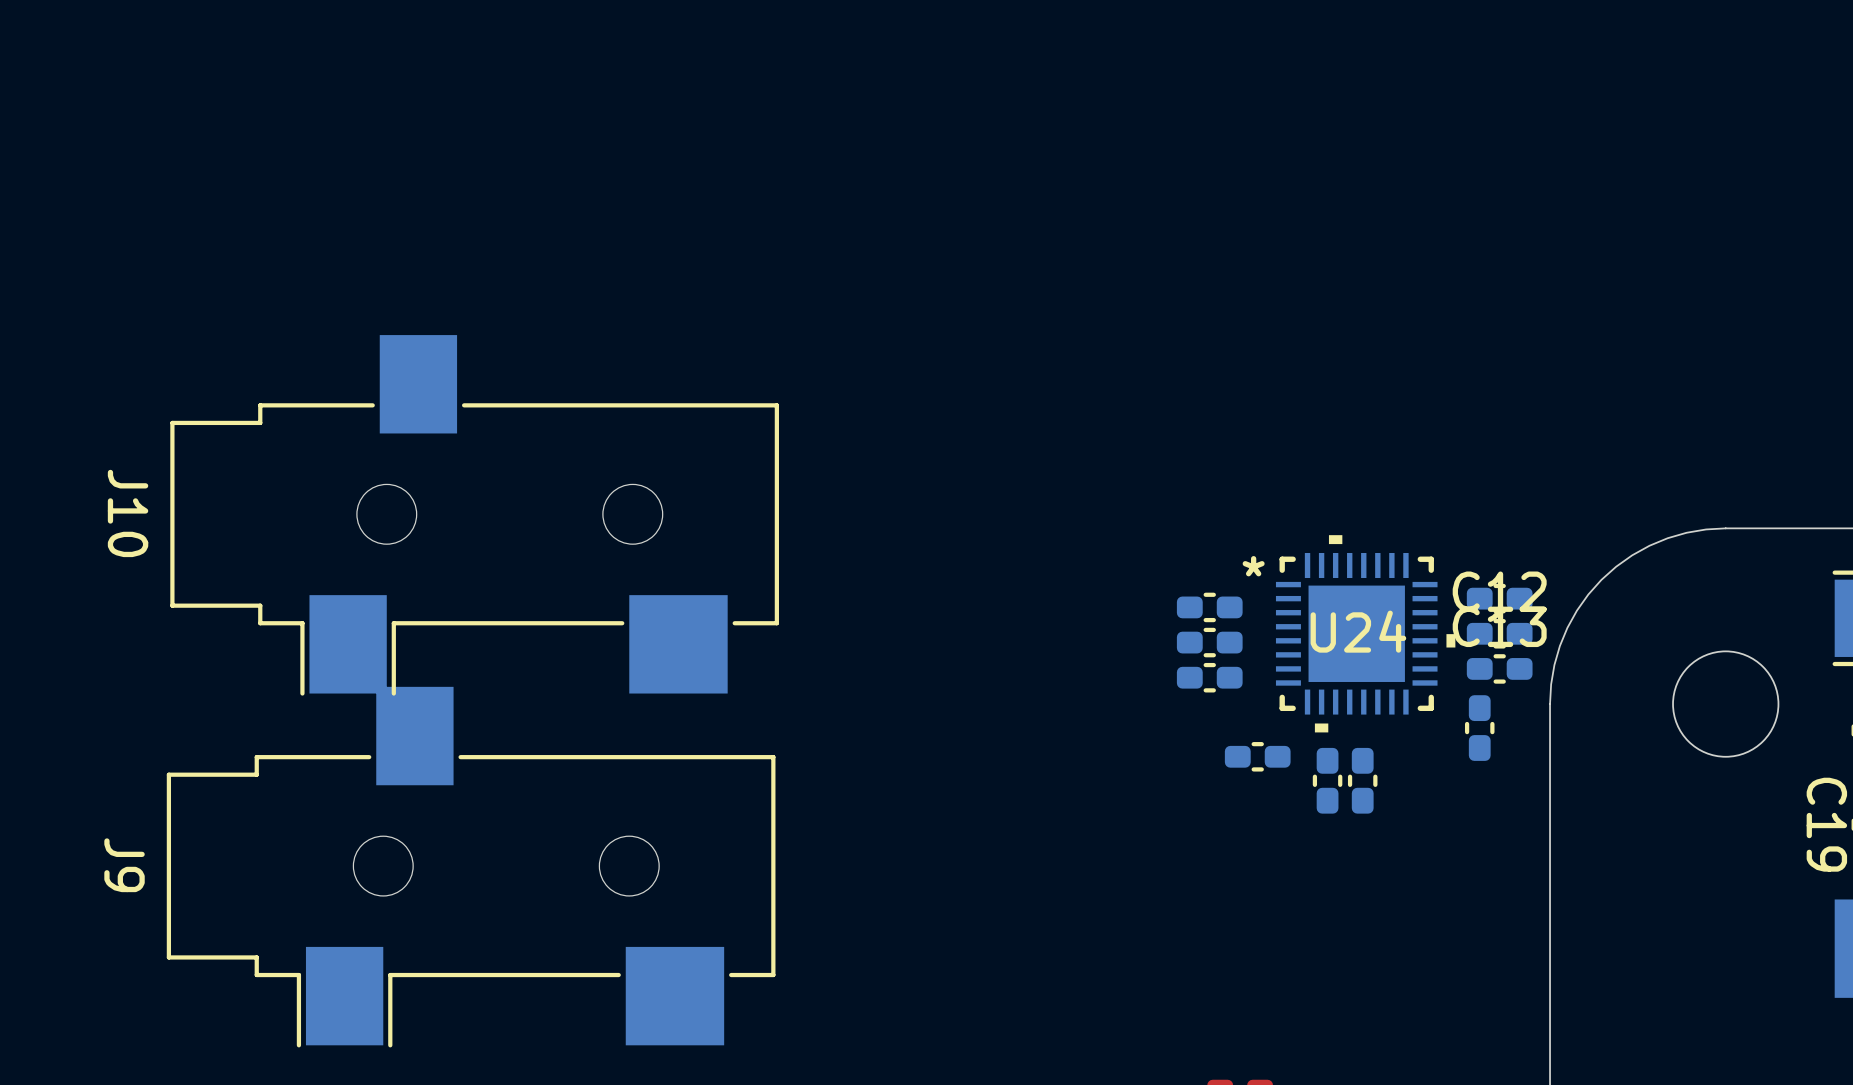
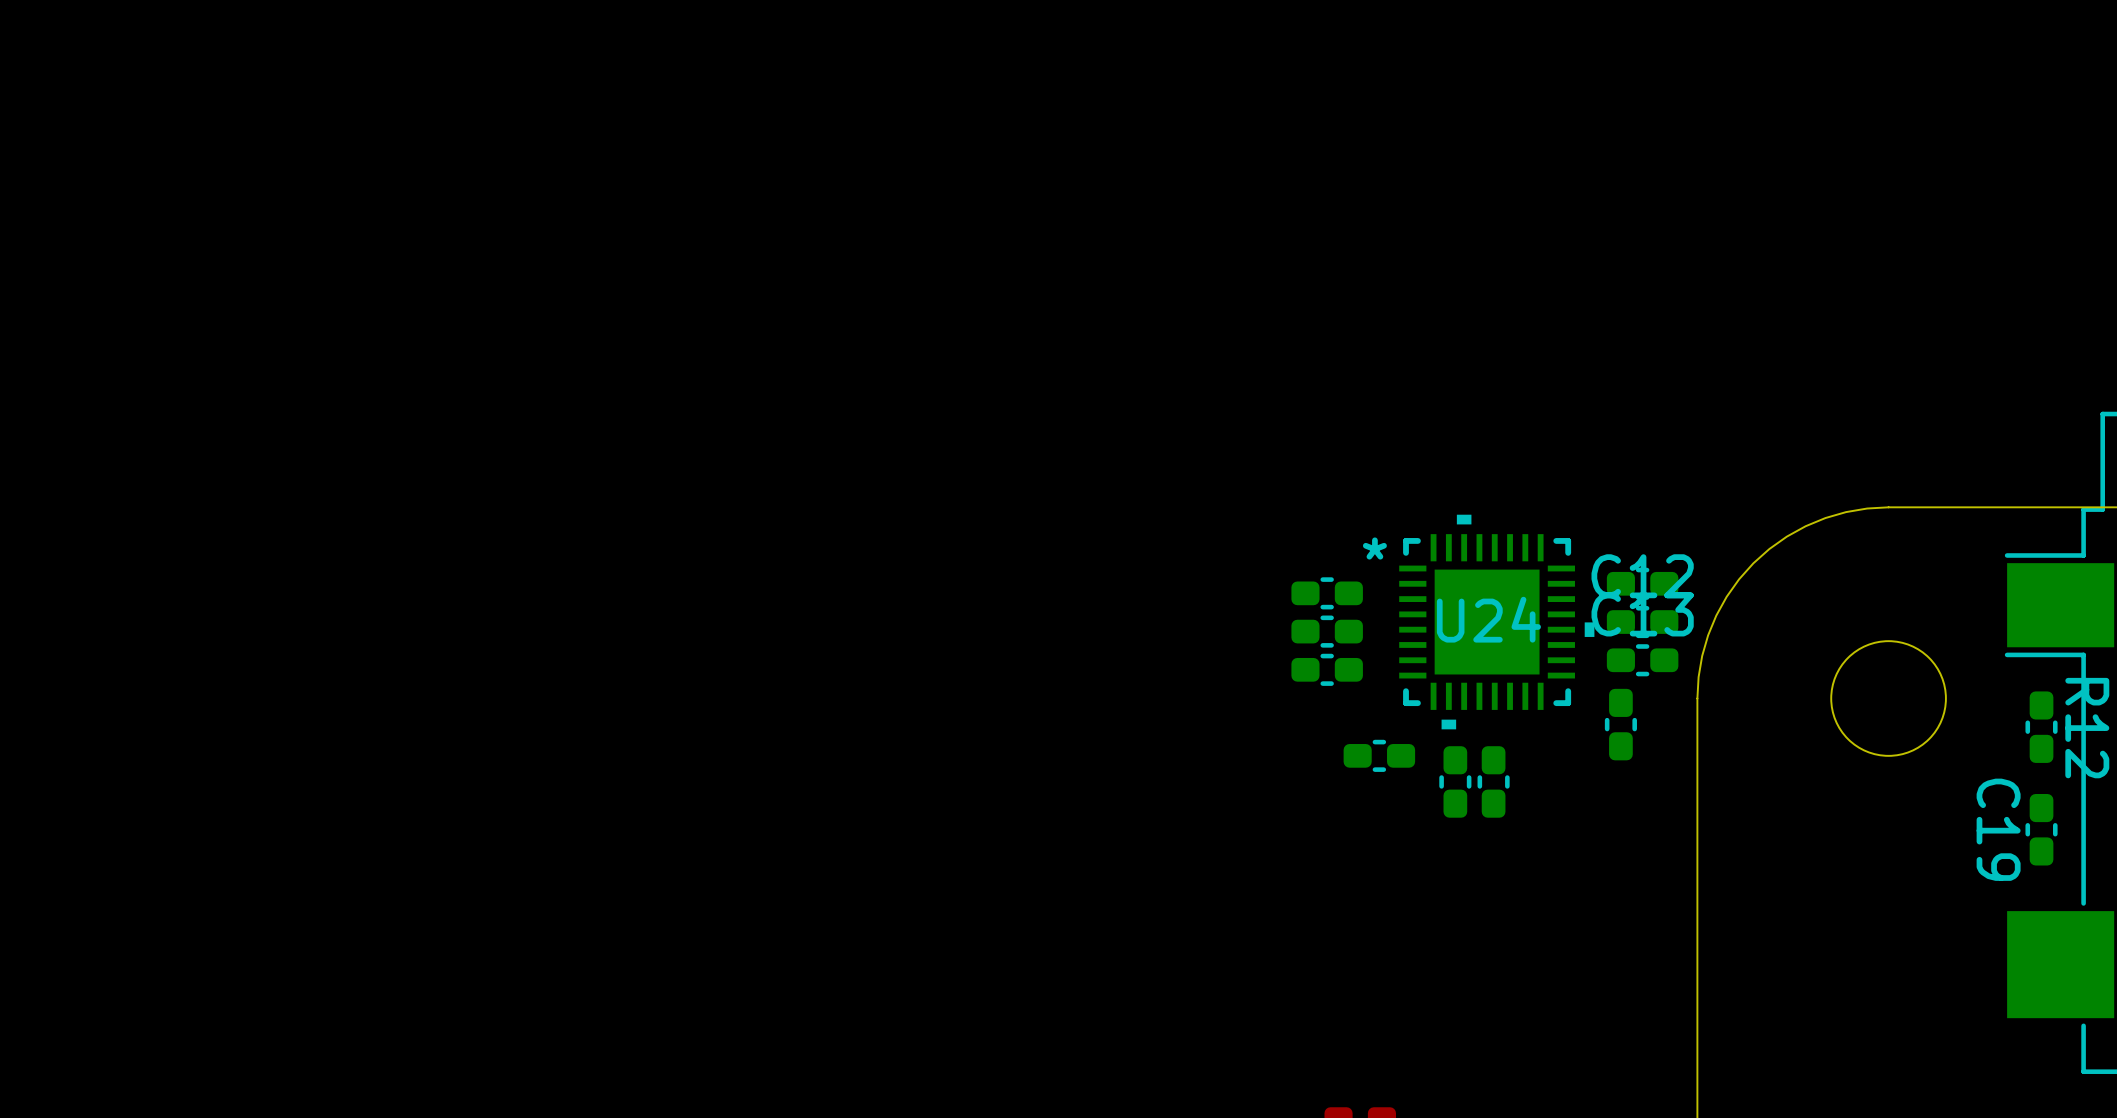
J10: (474, 515) -> none
J9: (471, 867) -> none

